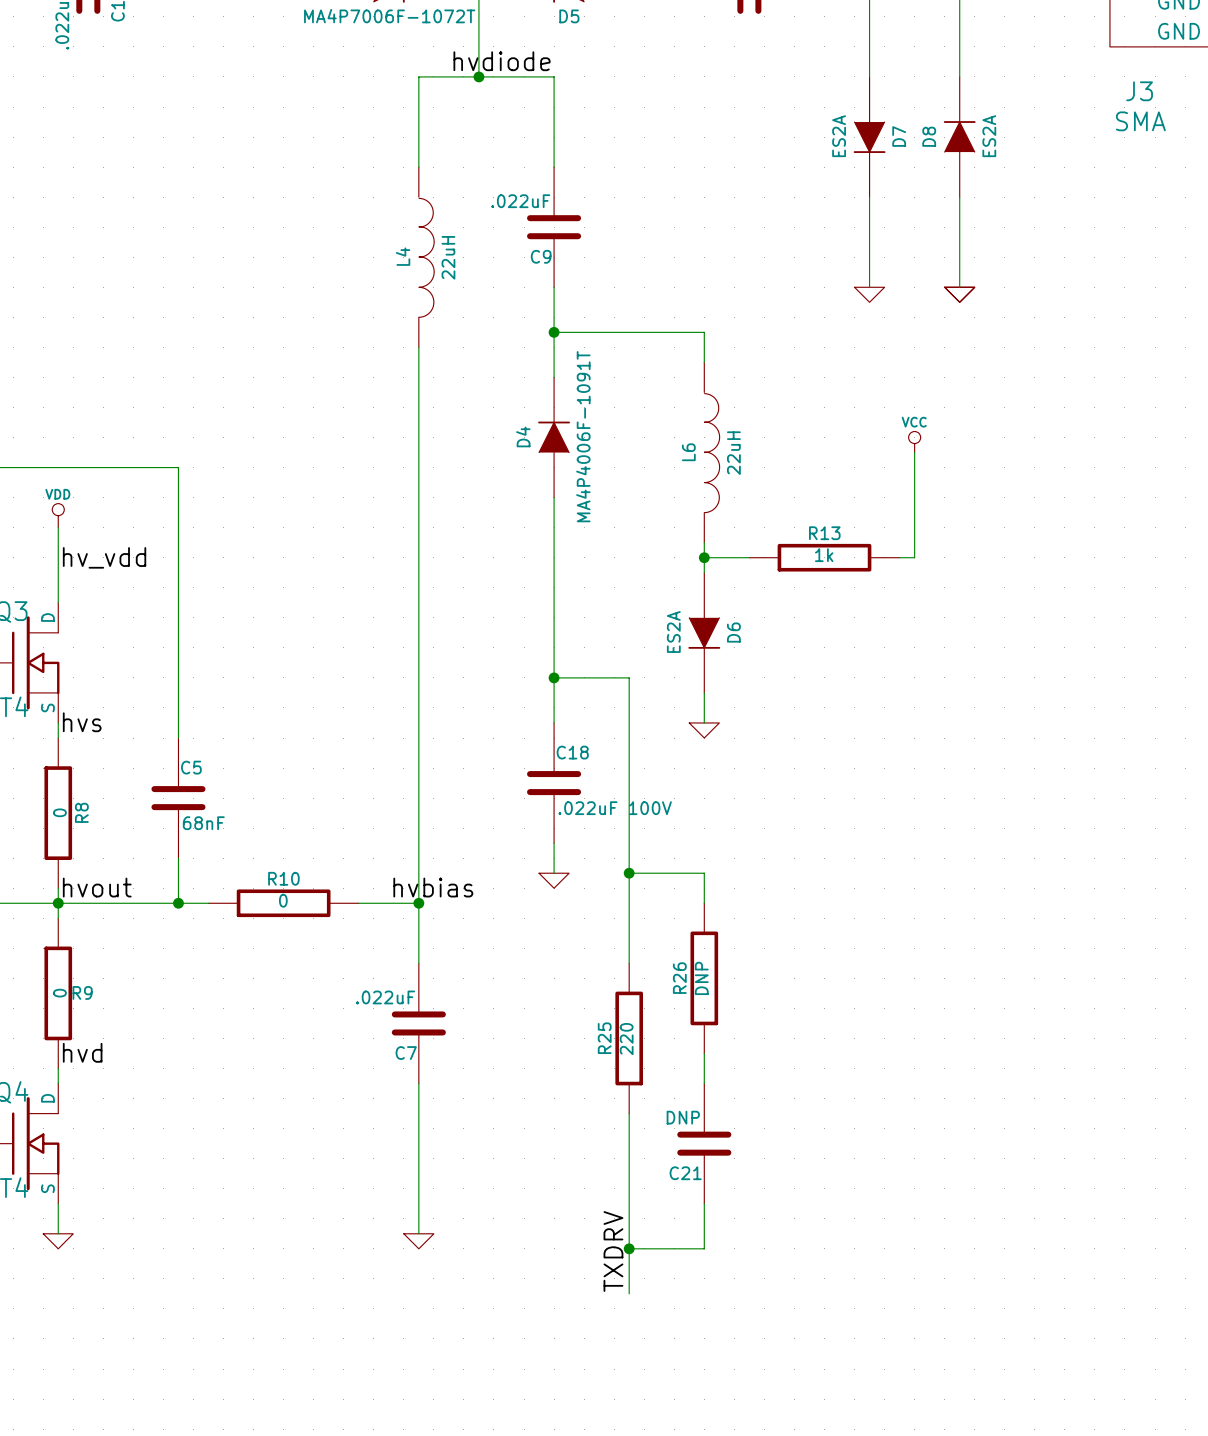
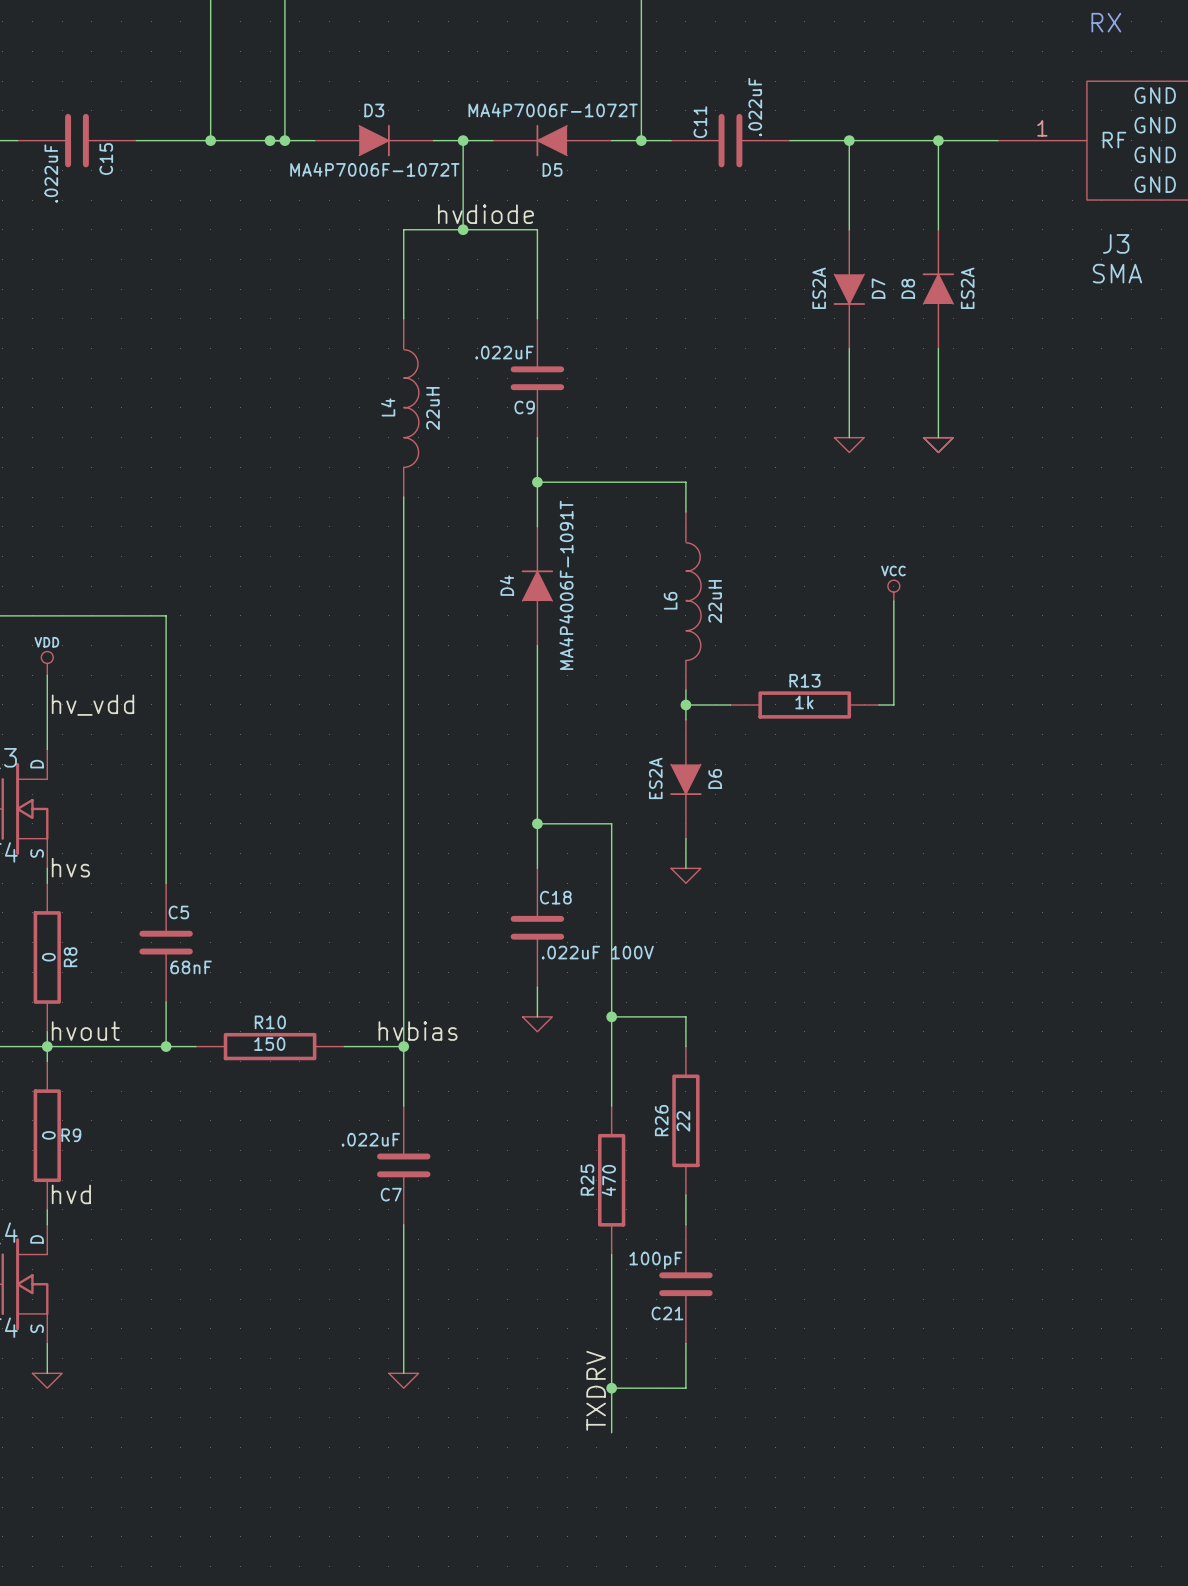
R10 value: 0 (283, 900) -> 150 (269, 1044)
R26 value: DNP (701, 978) -> 22 (683, 1121)
R25 value: 220 (626, 1039) -> 470 (608, 1180)
C21 value: DNP (683, 1117) -> 100pF (655, 1260)

